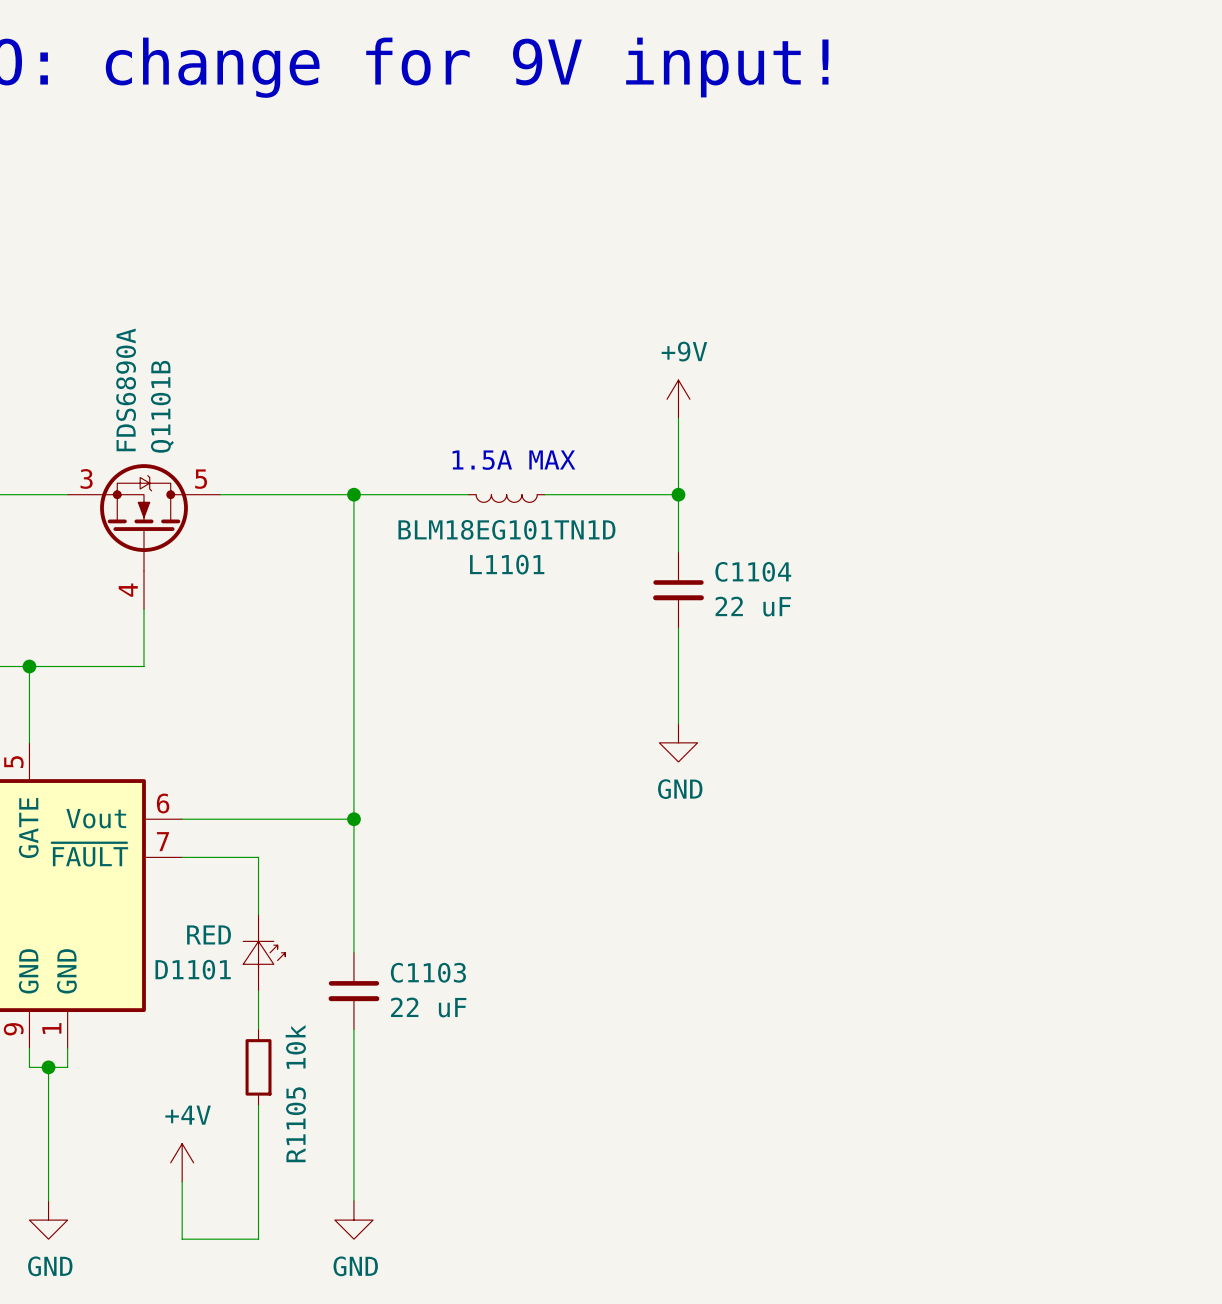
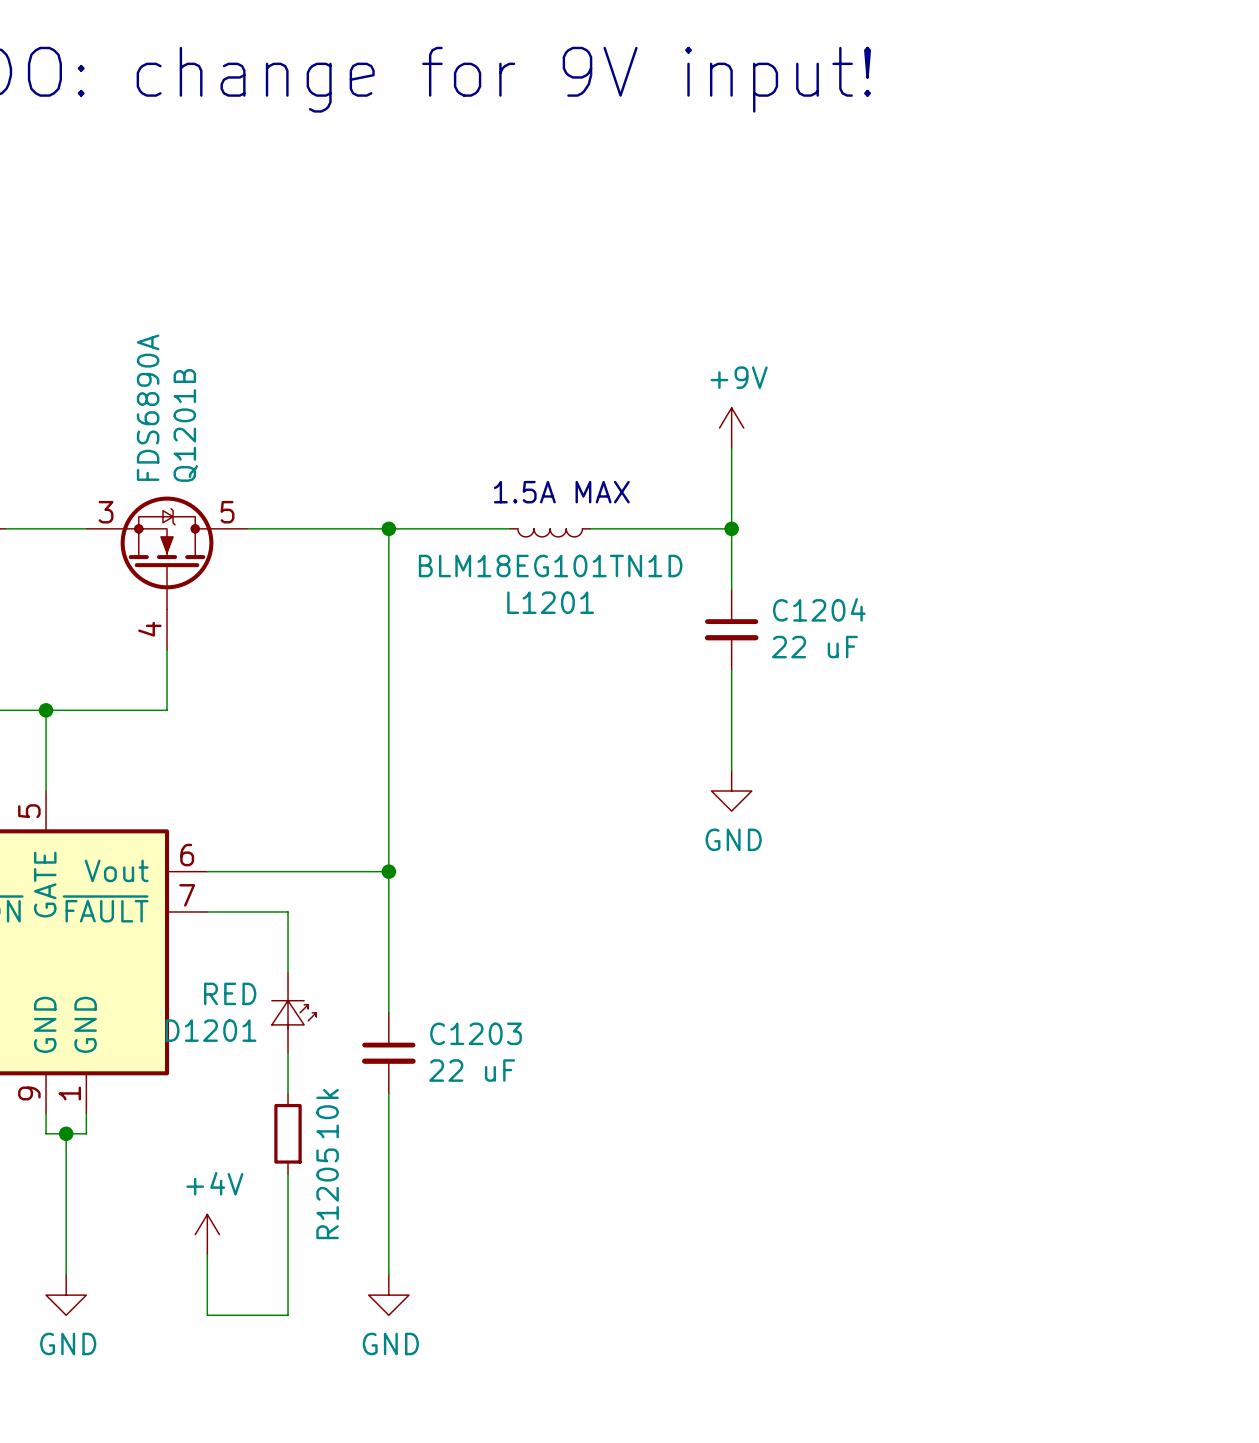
Q1101B name: Q1101B (162, 406) -> Q1201B (185, 425)
L1101 name: L1101 (507, 564) -> L1201 (550, 602)
C1104 name: C1104 (753, 571) -> C1204 (819, 609)
D1101 name: D1101 (193, 969) -> D1201 (210, 1030)
C1103 name: C1103 (428, 972) -> C1203 (476, 1033)
R1105 name: R1105 (296, 1124) -> R1205 (327, 1193)

